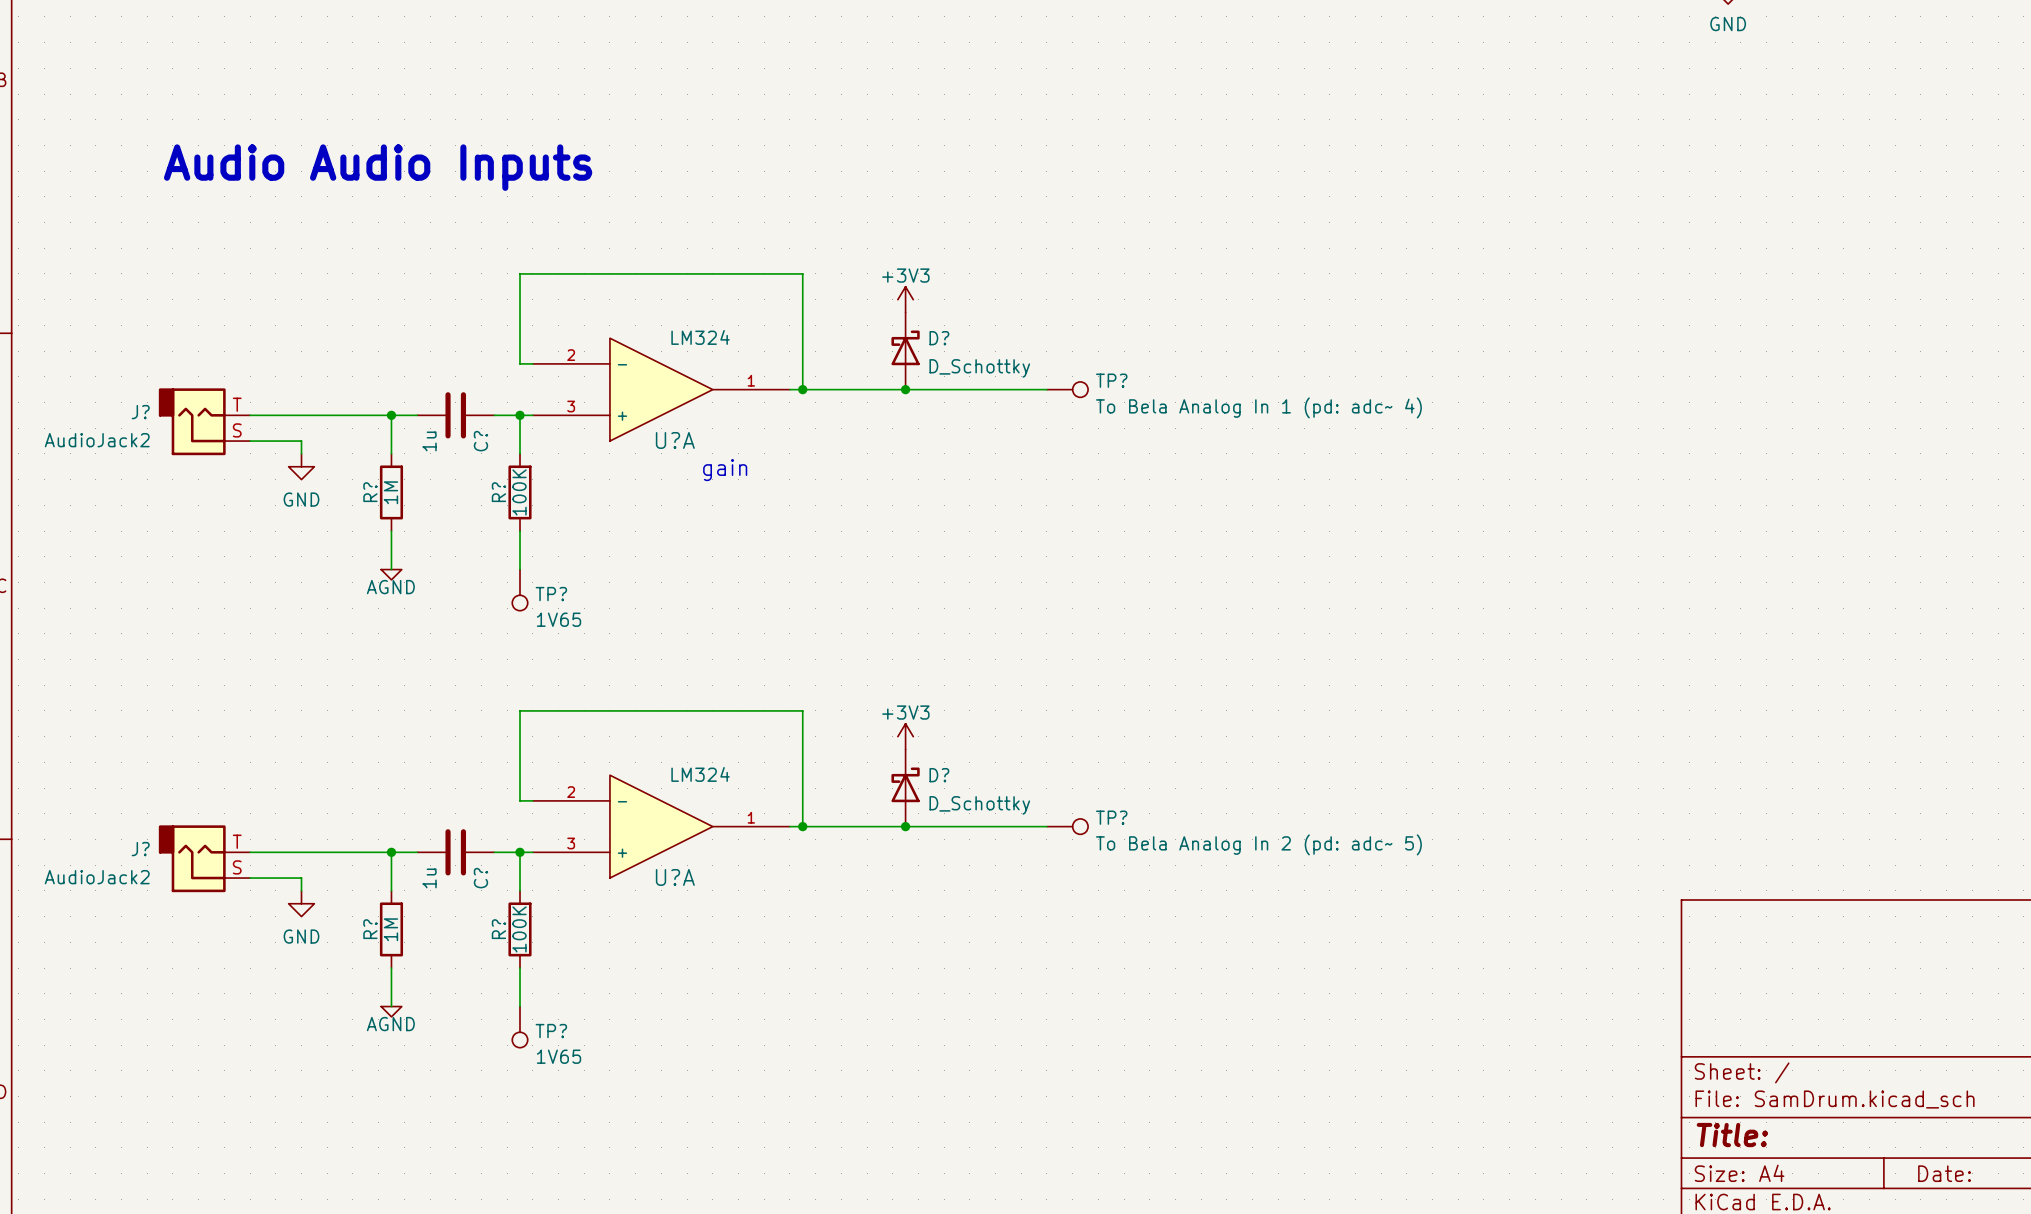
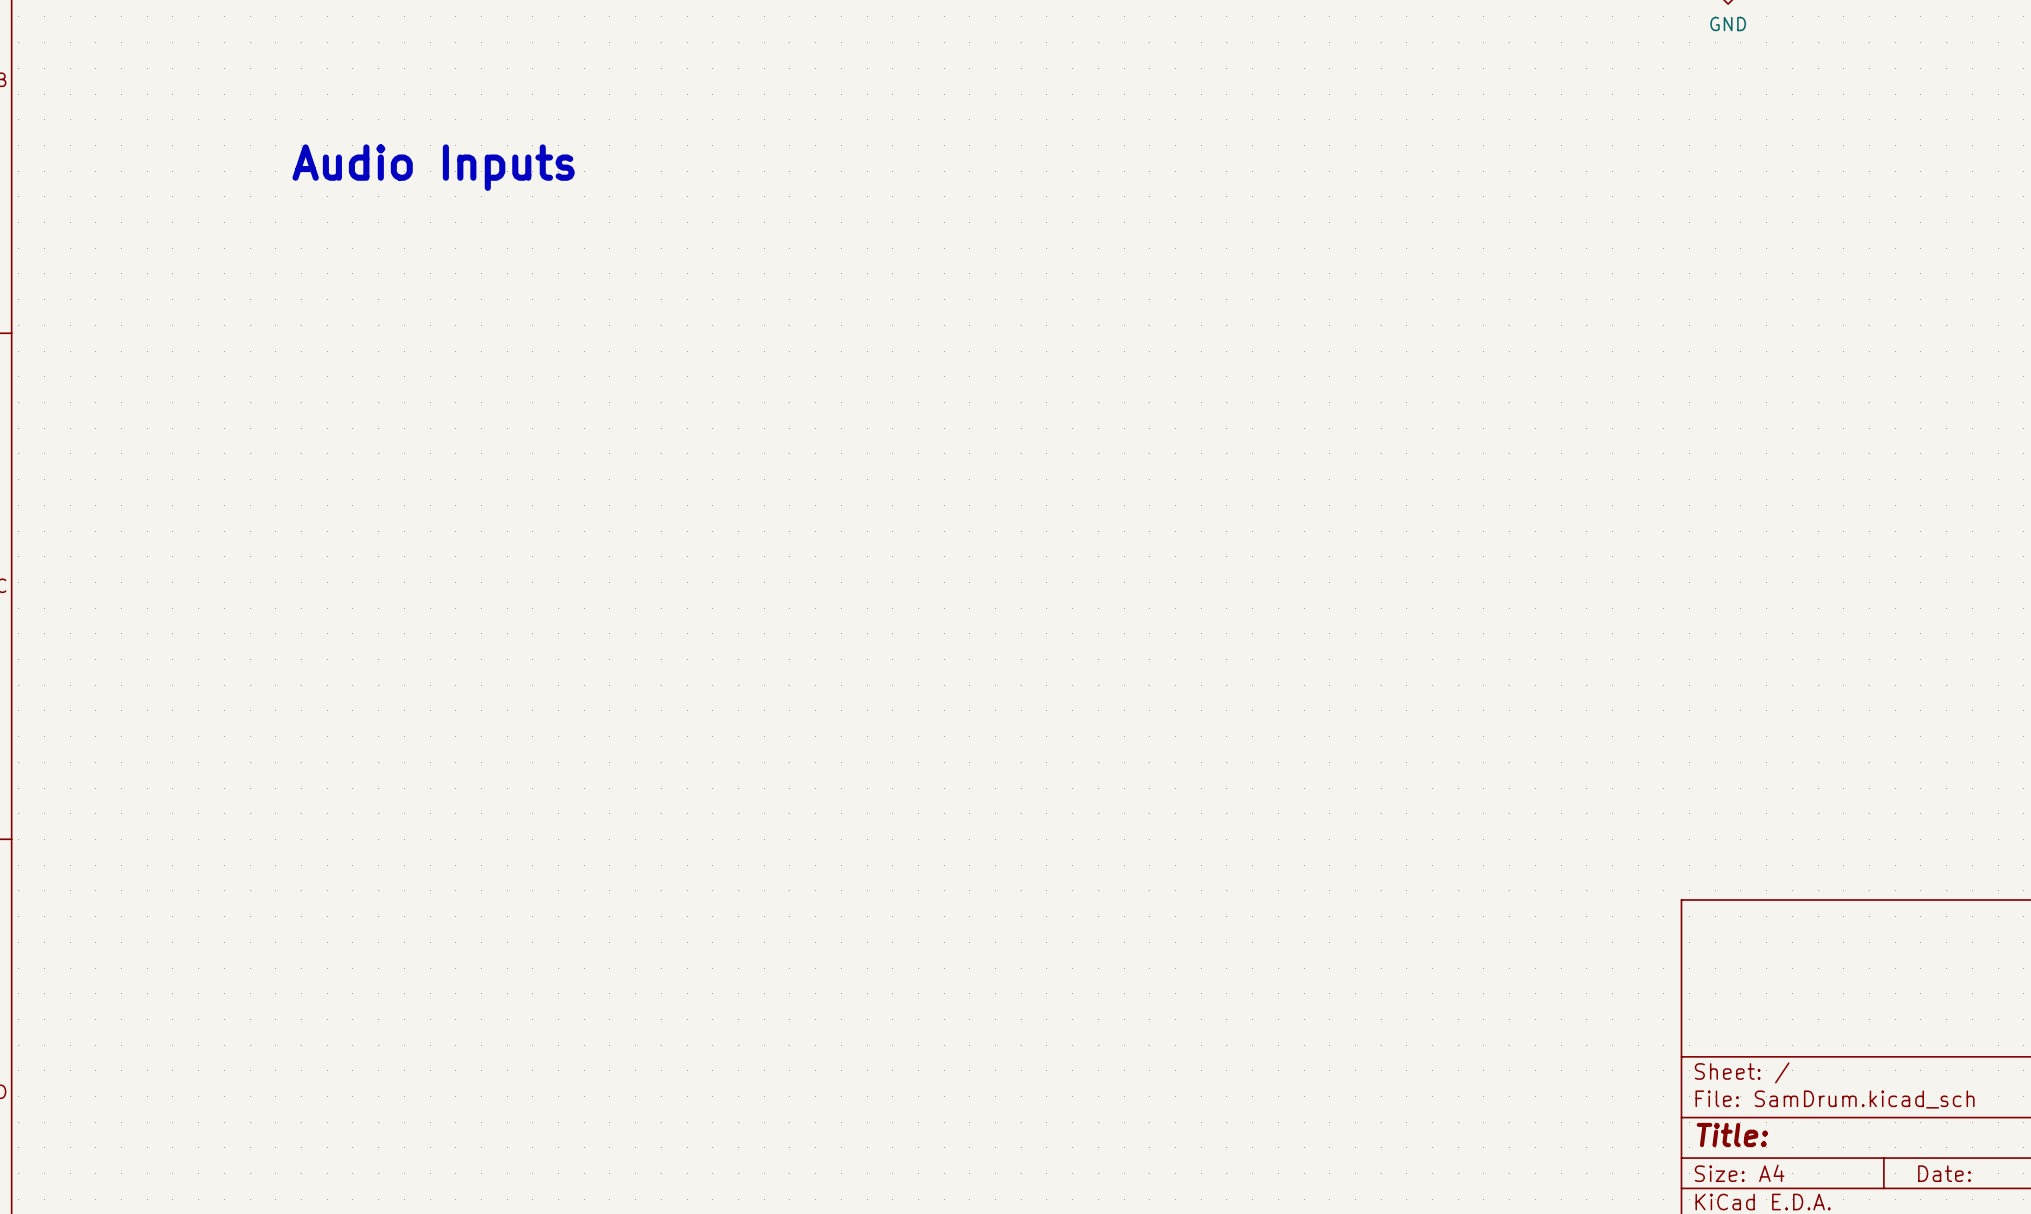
text: Audio Audio Inputs (378, 167) -> Audio Inputs (433, 167)
power symbol: +3V3 (905, 299) -> none
D?: D_Schottky (905, 351) -> none
wire: (532, 363) (519, 363) (519, 273) (802, 273) (802, 389) -> none
U?A: LM324 (661, 389) -> none
wire: (789, 389) (1046, 389) -> none
junction: (802, 389) -> none
junction: (905, 389) -> none
TP?: To Bela Analog In 1 (pd: adc~ 4) (1067, 389) -> none
wire: (250, 415) (417, 415) -> none
wire: (391, 415) (391, 453) -> none
junction: (391, 415) -> none
C?: 1u (455, 415) -> none
wire: (494, 415) (532, 415) -> none
wire: (519, 415) (519, 453) -> none
junction: (519, 415) -> none
J?: AudioJack2 (204, 421) -> none
wire: (250, 441) (301, 441) (301, 453) -> none
power symbol: GND (301, 466) -> none
text: gain (725, 470) -> none
R?: 1M (391, 492) -> none
R?: 100K (519, 492) -> none
wire: (391, 531) (391, 569) -> none
wire: (519, 531) (519, 569) -> none
power symbol: AGND (391, 574) -> none
TP?: 1V65 (519, 590) -> none
power symbol: +3V3 (905, 736) -> none
D?: D_Schottky (905, 788) -> none
wire: (532, 800) (519, 800) (519, 710) (802, 710) (802, 826) -> none
U?A: LM324 (661, 826) -> none
wire: (789, 826) (1046, 826) -> none
junction: (802, 826) -> none
junction: (905, 826) -> none
TP?: To Bela Analog In 2 (pd: adc~ 5) (1067, 826) -> none
wire: (250, 852) (417, 852) -> none
wire: (391, 852) (391, 890) -> none
junction: (391, 852) -> none
C?: 1u (455, 852) -> none
wire: (494, 852) (532, 852) -> none
wire: (519, 852) (519, 890) -> none
junction: (519, 852) -> none
J?: AudioJack2 (204, 858) -> none
wire: (250, 878) (301, 878) (301, 890) -> none
power symbol: GND (301, 903) -> none
R?: 1M (391, 929) -> none
R?: 100K (519, 929) -> none
wire: (391, 968) (391, 1006) -> none
wire: (519, 968) (519, 1006) -> none
power symbol: AGND (391, 1011) -> none
TP?: 1V65 (519, 1027) -> none

